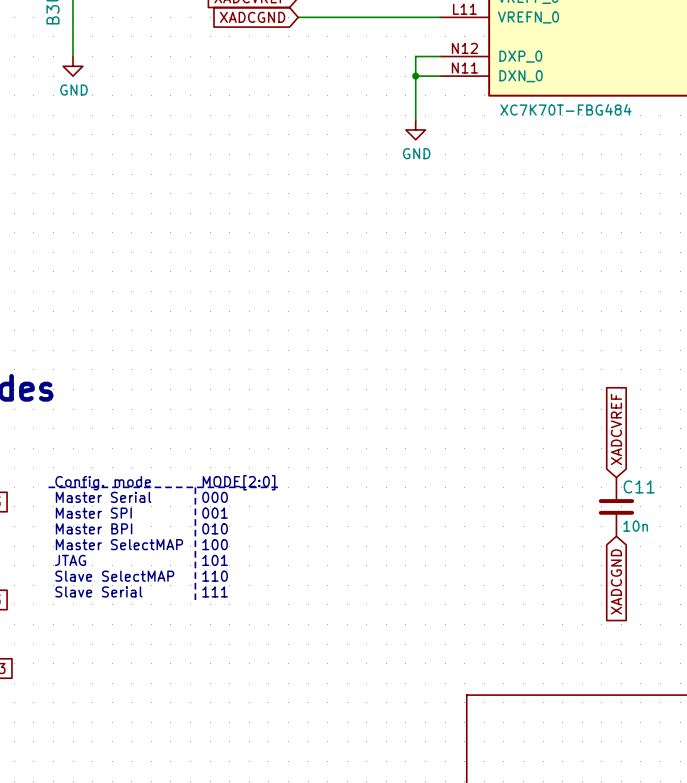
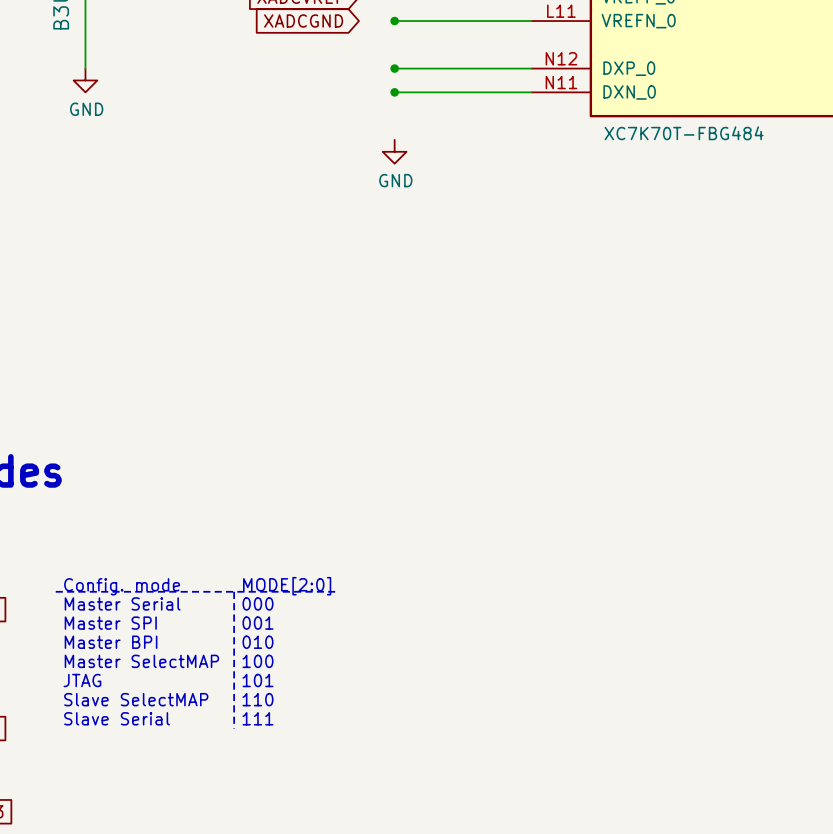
wire: (298, 17) (327, 17) -> none
junction: none -> (394, 21)
junction: none -> (394, 68)
wire: (415, 56) (415, 120) -> (501, 68) (394, 68)
wire: none -> (394, 92) (501, 92)
junction: none -> (394, 92)
junction: (415, 76) -> none
power symbol position: GND (415, 129) -> GND (394, 151)
global label: XADCVREF (616, 429) -> none
C11: (616, 506) -> none
global label: XADCGND (616, 581) -> none

